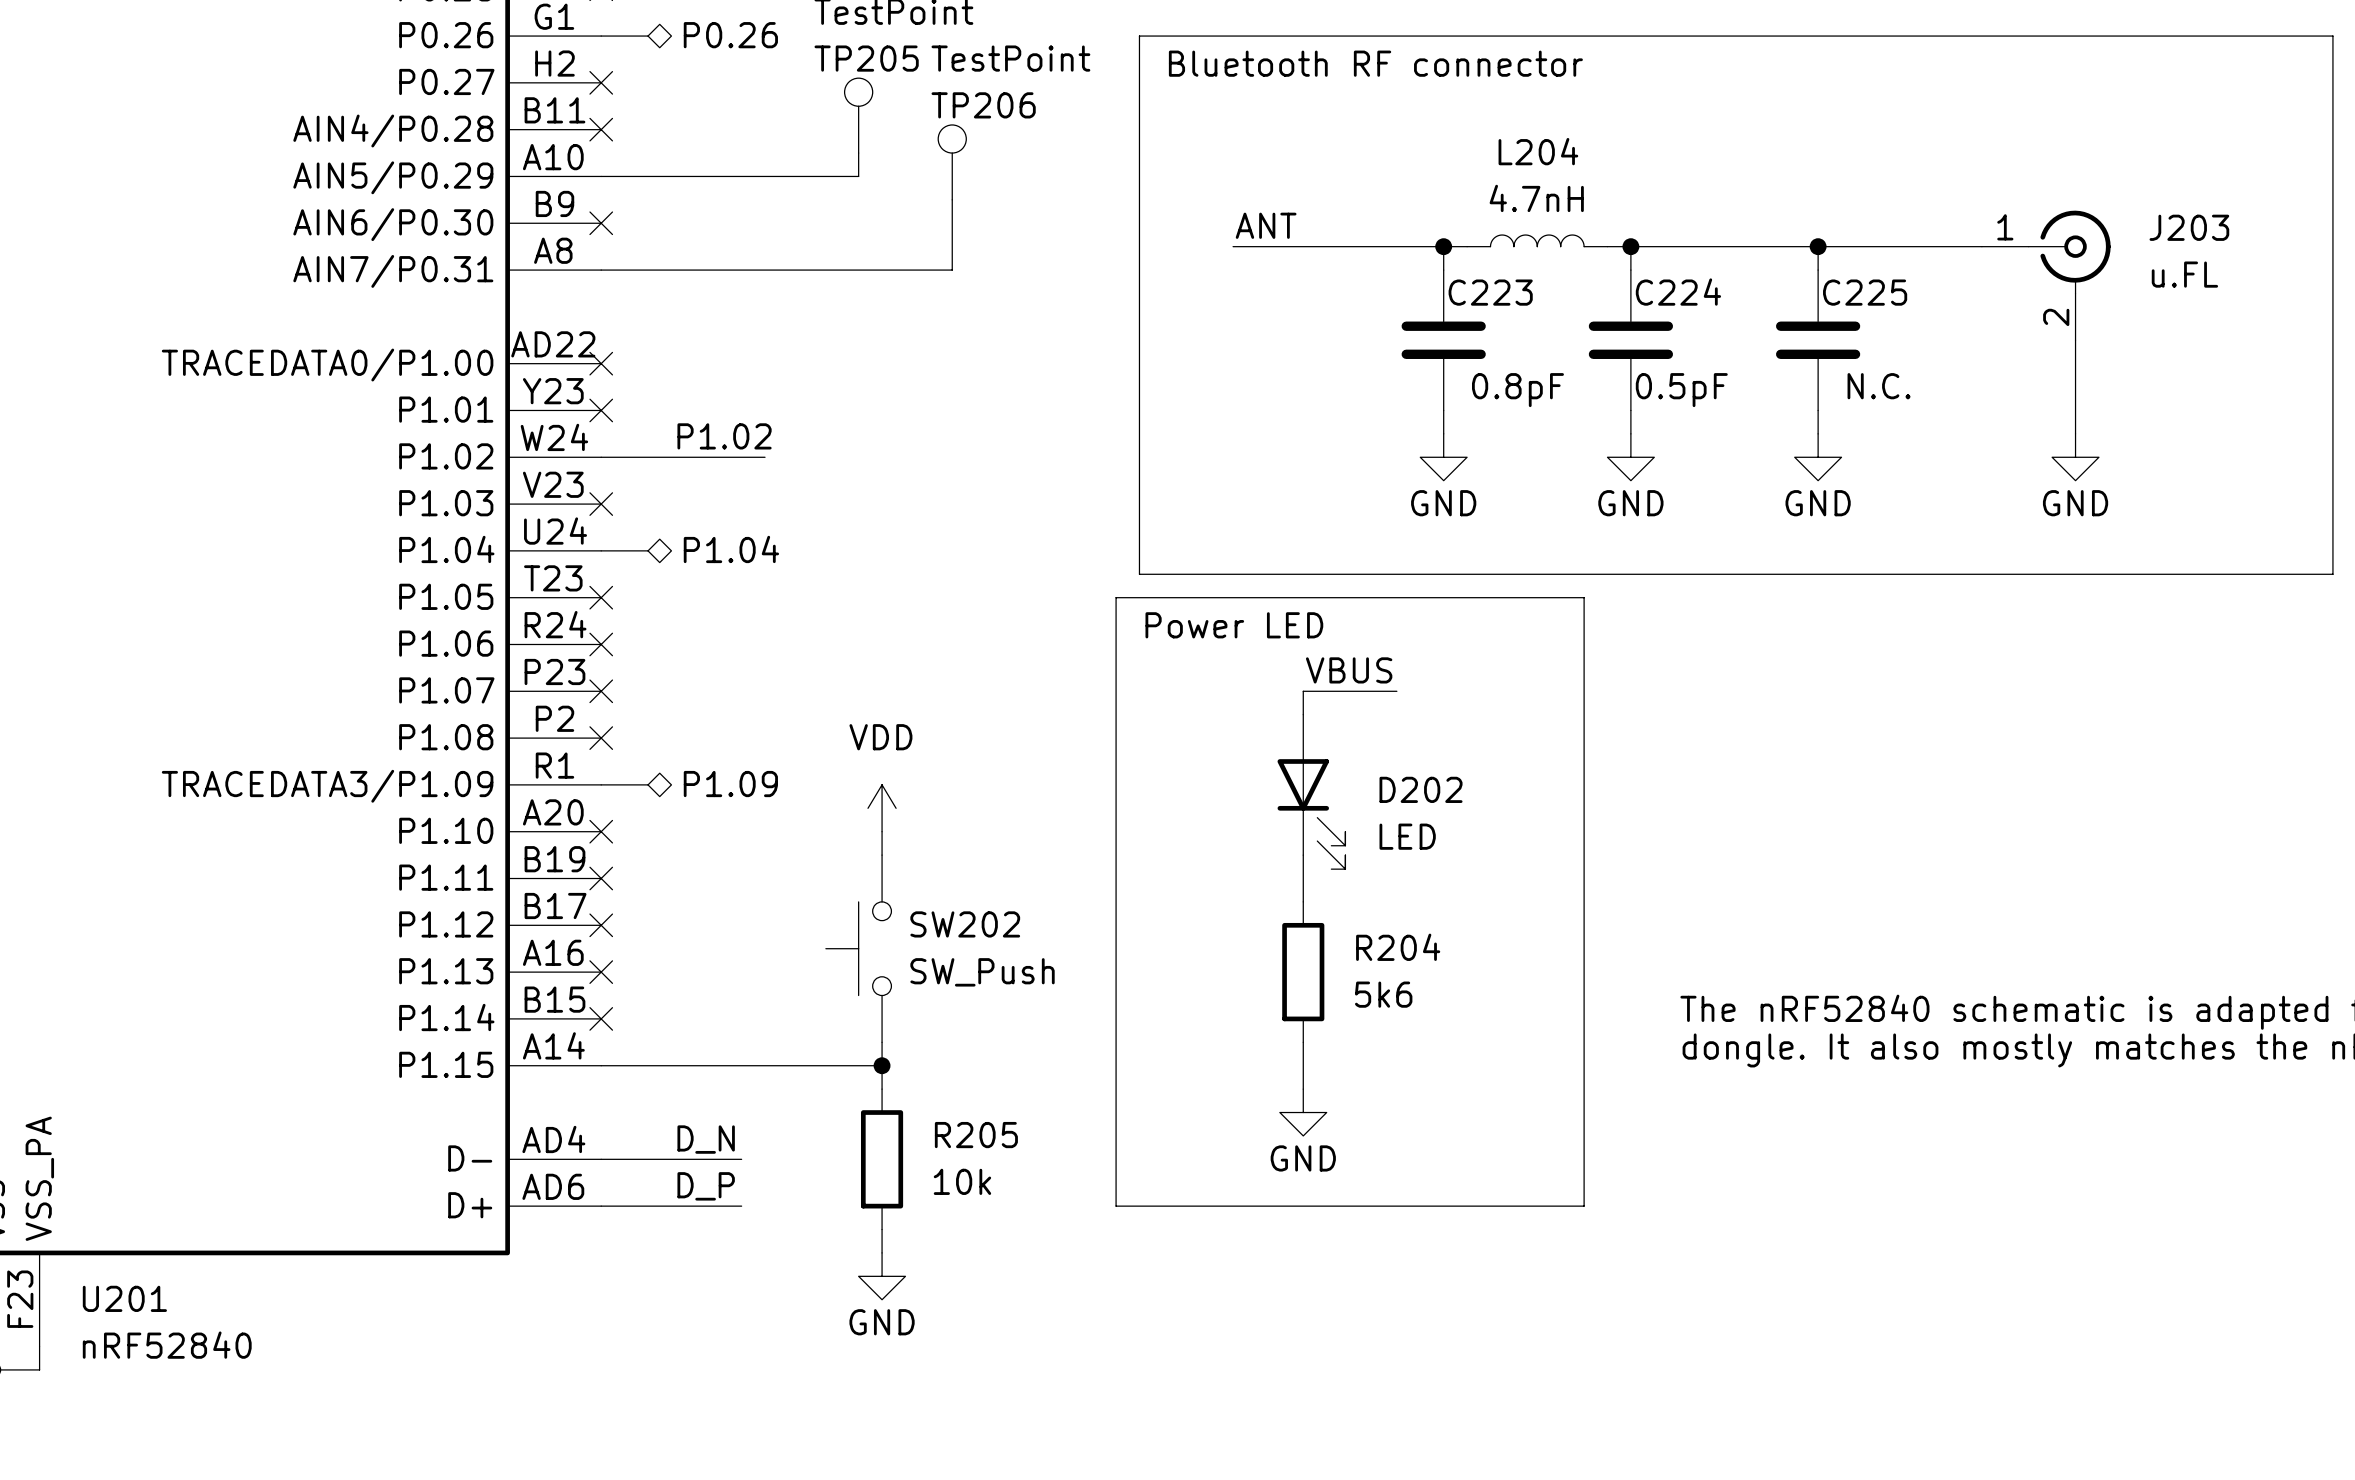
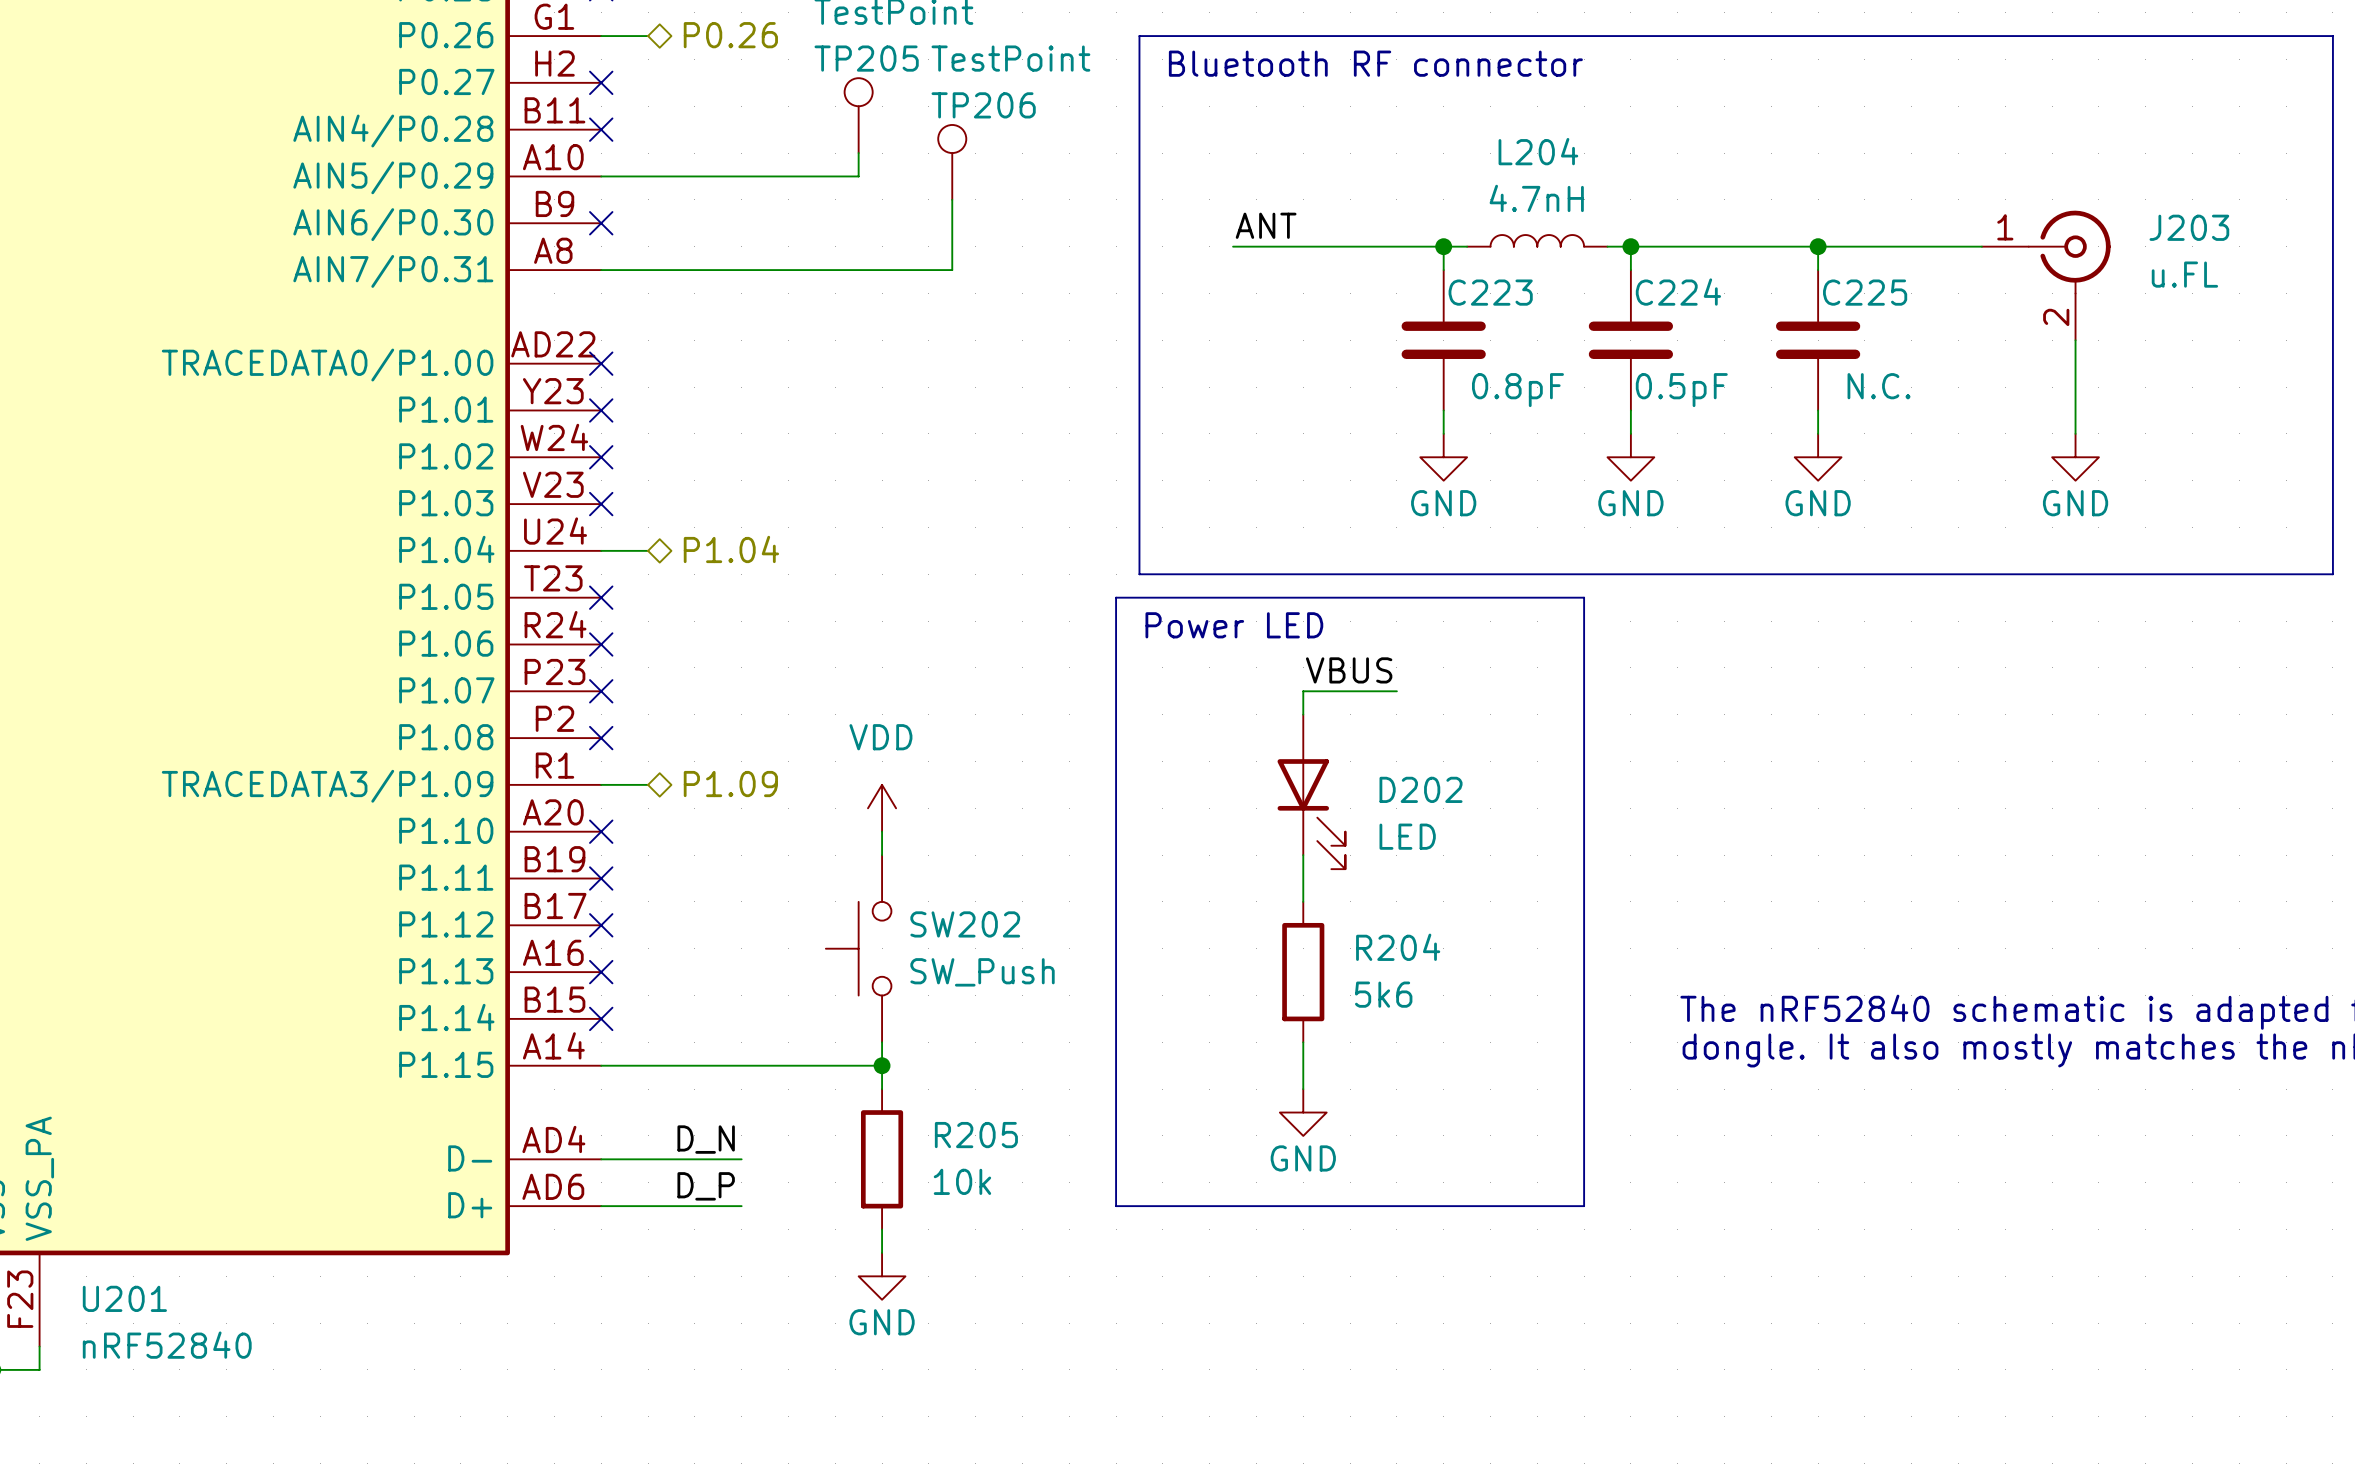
label: P1.02 (724, 436) -> none
wire: (601, 457) (765, 457) -> none
no-connect mark: none -> (601, 457)

